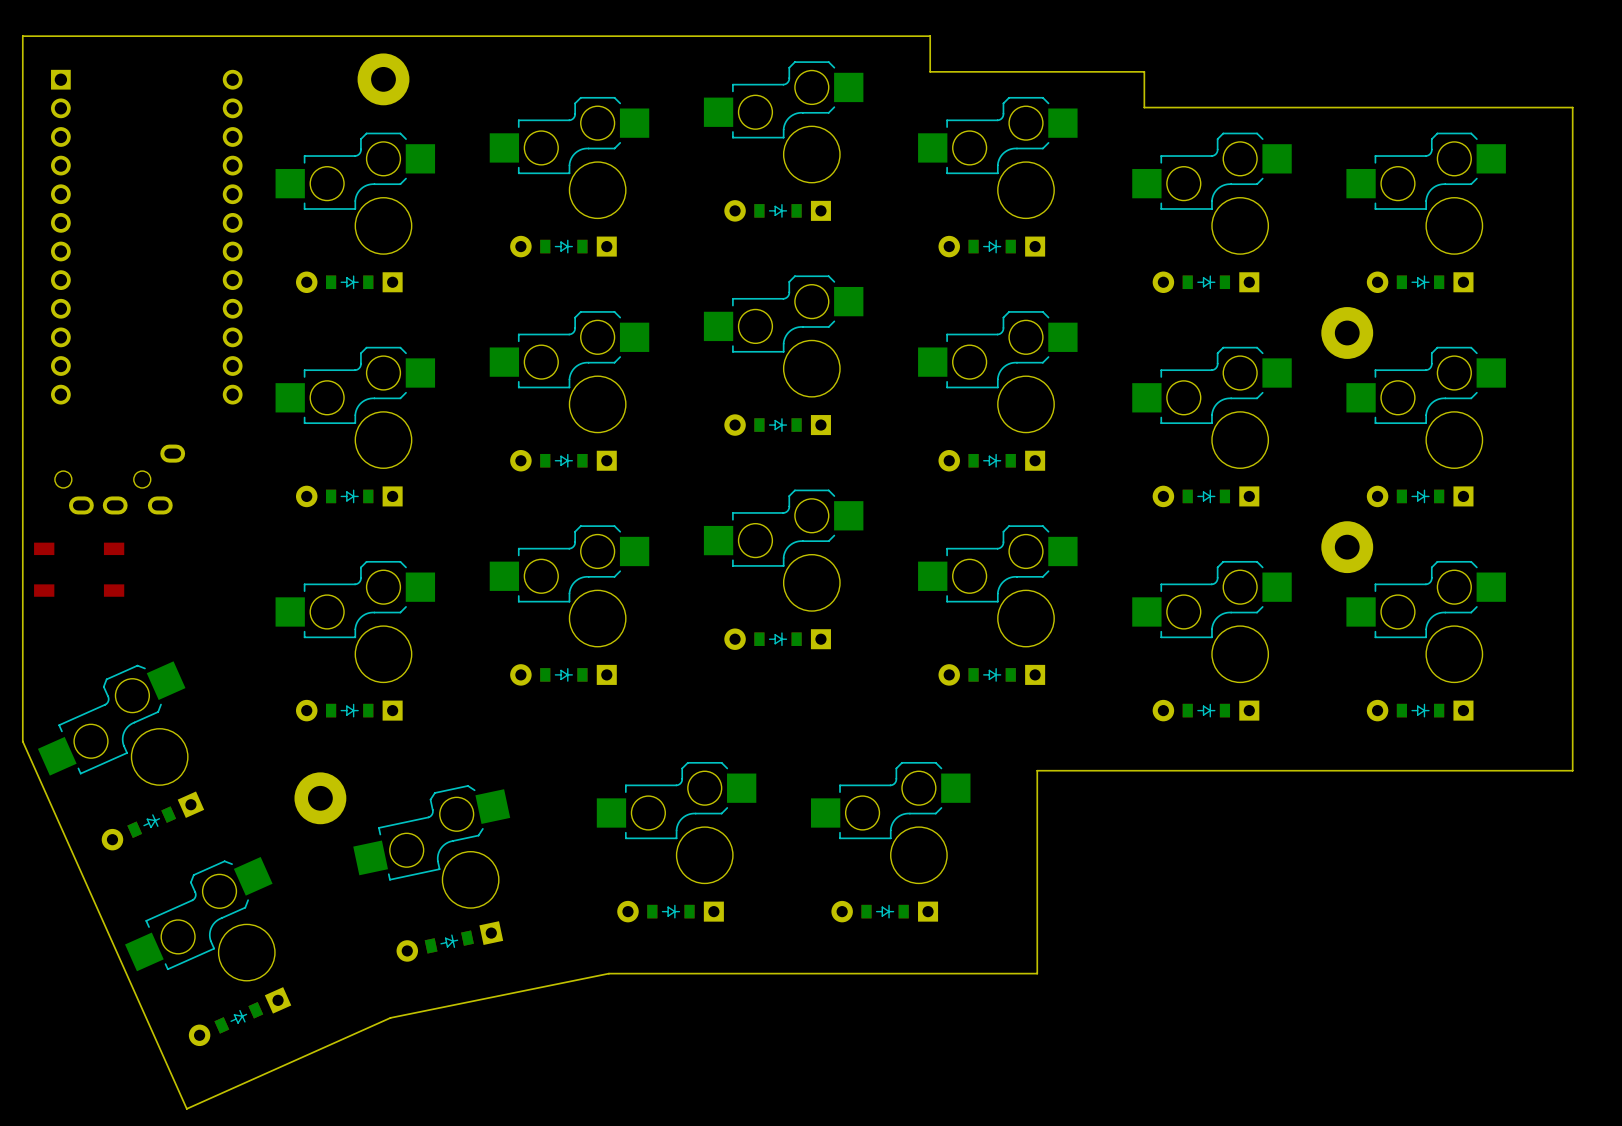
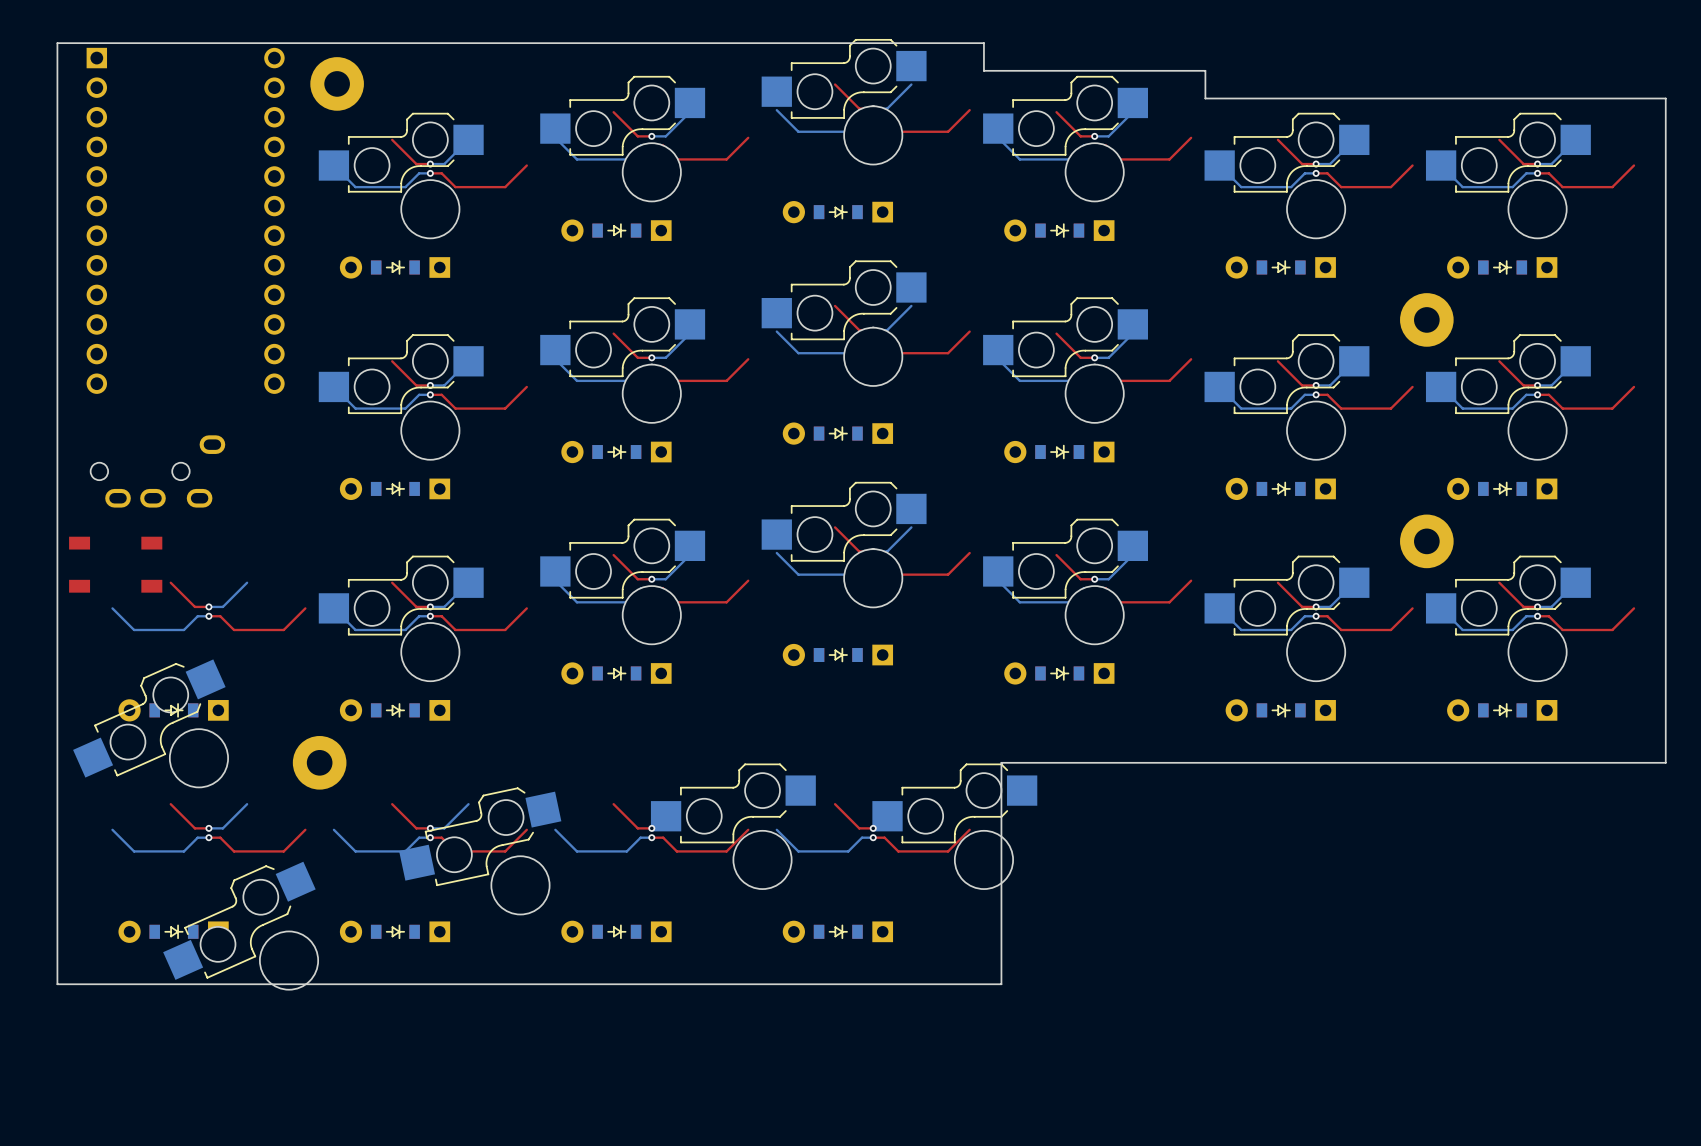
board edge: (22, 65) (22, 36) (930, 36) (930, 71) (1144, 71) (1144, 107) (1572, 107) (1572, 770) (1037, 770) (1037, 973) (608, 973) (390, 1017) (186, 1108) (22, 741) -> (57, 43) (983, 43) (983, 70) (1205, 70) (1205, 98) (1665, 98) (1665, 762) (1001, 762) (1001, 984) (57, 984) (57, 742)
part position: (383, 79) -> (337, 83)
top track: none -> (835, 84) (859, 108) (873, 108)
bottom track: none -> (911, 84) (887, 108) (873, 108)
bottom track: none -> (776, 110) (798, 131) (848, 131) (862, 118) (873, 118)
top track: none -> (969, 110) (948, 131) (898, 131) (884, 118) (873, 118)
top track: none -> (613, 112) (637, 136) (651, 136)
bottom track: none -> (689, 112) (665, 136) (651, 136)
top track: none -> (1056, 112) (1080, 136) (1094, 136)
bottom track: none -> (1132, 112) (1108, 136) (1094, 136)
via: none -> (651, 136)
via: none -> (1094, 136)
bottom track: none -> (555, 137) (576, 159) (626, 159) (640, 145) (651, 145)
top track: none -> (748, 137) (726, 159) (676, 159) (663, 145) (651, 145)
bottom track: none -> (998, 137) (1019, 159) (1069, 159) (1083, 145) (1094, 145)
top track: none -> (1191, 137) (1169, 159) (1119, 159) (1106, 145) (1094, 145)
top track: none -> (392, 139) (416, 164) (430, 164)
bottom track: none -> (468, 139) (444, 164) (430, 164)
top track: none -> (1277, 139) (1302, 164) (1316, 164)
bottom track: none -> (1354, 139) (1330, 164) (1316, 164)
top track: none -> (1499, 139) (1523, 164) (1537, 164)
bottom track: none -> (1575, 139) (1551, 164) (1537, 164)
via: none -> (430, 164)
via: none -> (1316, 164)
via: none -> (1537, 164)
bottom track: none -> (333, 165) (355, 187) (405, 187) (419, 173) (430, 173)
top track: none -> (526, 165) (505, 187) (455, 187) (441, 173) (430, 173)
bottom track: none -> (1219, 165) (1241, 187) (1291, 187) (1304, 173) (1316, 173)
top track: none -> (1412, 165) (1390, 187) (1341, 187) (1327, 173) (1316, 173)
bottom track: none -> (1441, 165) (1462, 187) (1512, 187) (1526, 173) (1537, 173)
top track: none -> (1633, 165) (1612, 187) (1562, 187) (1548, 173) (1537, 173)
via: none -> (430, 173)
via: none -> (1316, 173)
via: none -> (1537, 173)
part position: (777, 210) -> (837, 212)
top track: none -> (835, 305) (859, 330) (873, 330)
bottom track: none -> (911, 305) (887, 330) (873, 330)
bottom track: none -> (776, 331) (798, 353) (848, 353) (862, 339) (873, 339)
top track: none -> (969, 331) (948, 353) (898, 353) (884, 339) (873, 339)
top track: none -> (613, 333) (637, 357) (651, 357)
bottom track: none -> (689, 333) (665, 357) (651, 357)
top track: none -> (1056, 333) (1080, 357) (1094, 357)
bottom track: none -> (1132, 333) (1108, 357) (1094, 357)
via: none -> (651, 357)
via: none -> (1094, 357)
bottom track: none -> (555, 359) (576, 380) (626, 380) (640, 367) (651, 367)
top track: none -> (748, 359) (726, 380) (676, 380) (663, 367) (651, 367)
bottom track: none -> (998, 359) (1019, 380) (1069, 380) (1083, 367) (1094, 367)
top track: none -> (1191, 359) (1169, 380) (1119, 380) (1106, 367) (1094, 367)
top track: none -> (392, 361) (416, 385) (430, 385)
bottom track: none -> (468, 361) (444, 385) (430, 385)
top track: none -> (1277, 361) (1302, 385) (1316, 385)
bottom track: none -> (1354, 361) (1330, 385) (1316, 385)
top track: none -> (1499, 361) (1523, 385) (1537, 385)
bottom track: none -> (1575, 361) (1551, 385) (1537, 385)
via: none -> (430, 385)
via: none -> (1316, 385)
via: none -> (1537, 385)
bottom track: none -> (333, 386) (355, 408) (405, 408) (419, 394) (430, 394)
top track: none -> (526, 386) (505, 408) (455, 408) (441, 394) (430, 394)
bottom track: none -> (1219, 386) (1241, 408) (1291, 408) (1304, 394) (1316, 394)
top track: none -> (1412, 386) (1390, 408) (1341, 408) (1327, 394) (1316, 394)
bottom track: none -> (1441, 386) (1462, 408) (1512, 408) (1526, 394) (1537, 394)
top track: none -> (1633, 386) (1612, 408) (1562, 408) (1548, 394) (1537, 394)
via: none -> (430, 394)
via: none -> (1316, 394)
via: none -> (1537, 394)
part position: (777, 425) -> (837, 433)
top track: none -> (835, 527) (859, 551) (873, 551)
bottom track: none -> (911, 527) (887, 551) (873, 551)
bottom track: none -> (776, 553) (798, 574) (848, 574) (862, 560) (873, 560)
top track: none -> (969, 553) (948, 574) (898, 574) (884, 560) (873, 560)
top track: none -> (613, 555) (637, 579) (651, 579)
bottom track: none -> (689, 555) (665, 579) (651, 579)
top track: none -> (1056, 555) (1080, 579) (1094, 579)
bottom track: none -> (1132, 555) (1108, 579) (1094, 579)
via: none -> (651, 579)
via: none -> (1094, 579)
bottom track: none -> (555, 580) (576, 602) (626, 602) (640, 588) (651, 588)
top track: none -> (748, 580) (726, 602) (676, 602) (663, 588) (651, 588)
bottom track: none -> (998, 580) (1019, 602) (1069, 602) (1083, 588) (1094, 588)
top track: none -> (1191, 580) (1169, 602) (1119, 602) (1106, 588) (1094, 588)
top track: none -> (170, 582) (194, 606) (208, 606)
bottom track: none -> (247, 582) (222, 606) (208, 606)
top track: none -> (392, 582) (416, 606) (430, 606)
bottom track: none -> (468, 582) (444, 606) (430, 606)
top track: none -> (1277, 582) (1302, 606) (1316, 606)
bottom track: none -> (1354, 582) (1330, 606) (1316, 606)
top track: none -> (1499, 582) (1523, 606) (1537, 606)
bottom track: none -> (1575, 582) (1551, 606) (1537, 606)
via: none -> (208, 606)
via: none -> (430, 606)
via: none -> (1316, 606)
via: none -> (1537, 606)
bottom track: none -> (112, 608) (134, 630) (183, 630) (197, 616) (208, 616)
top track: none -> (305, 608) (283, 630) (234, 630) (220, 616) (208, 616)
bottom track: none -> (333, 608) (355, 630) (405, 630) (419, 616) (430, 616)
top track: none -> (526, 608) (505, 630) (455, 630) (441, 616) (430, 616)
bottom track: none -> (1219, 608) (1241, 630) (1291, 630) (1304, 616) (1316, 616)
top track: none -> (1412, 608) (1390, 630) (1341, 630) (1327, 616) (1316, 616)
bottom track: none -> (1441, 608) (1462, 630) (1512, 630) (1526, 616) (1537, 616)
top track: none -> (1633, 608) (1612, 630) (1562, 630) (1548, 616) (1537, 616)
via: none -> (208, 616)
via: none -> (430, 616)
via: none -> (1316, 616)
via: none -> (1537, 616)
part position: (777, 639) -> (837, 655)
part: none -> (173, 710)
part position: (320, 798) -> (319, 762)
top track: none -> (170, 804) (194, 828) (208, 828)
bottom track: none -> (247, 804) (222, 828) (208, 828)
top track: none -> (392, 804) (416, 828) (430, 828)
bottom track: none -> (468, 804) (444, 828) (430, 828)
top track: none -> (613, 804) (637, 828) (651, 828)
top track: none -> (835, 804) (859, 828) (873, 828)
part: (152, 820) -> none
via: none -> (208, 828)
via: none -> (430, 828)
via: none -> (651, 828)
via: none -> (873, 828)
bottom track: none -> (112, 829) (134, 851) (183, 851) (197, 837) (208, 837)
top track: none -> (305, 829) (283, 851) (234, 851) (220, 837) (208, 837)
bottom track: none -> (333, 829) (355, 851) (405, 851) (419, 837) (430, 837)
top track: none -> (526, 829) (505, 851) (455, 851) (441, 837) (430, 837)
bottom track: none -> (555, 829) (576, 851) (626, 851) (640, 837) (651, 837)
top track: none -> (748, 829) (726, 851) (676, 851) (663, 837) (651, 837)
bottom track: none -> (776, 829) (798, 851) (848, 851) (862, 837) (873, 837)
top track: none -> (969, 829) (948, 851) (898, 851) (884, 837) (873, 837)
via: none -> (208, 837)
via: none -> (430, 837)
via: none -> (651, 837)
via: none -> (873, 837)
part: (670, 911) -> none
part: (884, 911) -> none
part: none -> (173, 931)
part: none -> (395, 931)
part: none -> (616, 931)
part: none -> (837, 931)
part: (449, 941) -> none
part: (240, 1016) -> none

